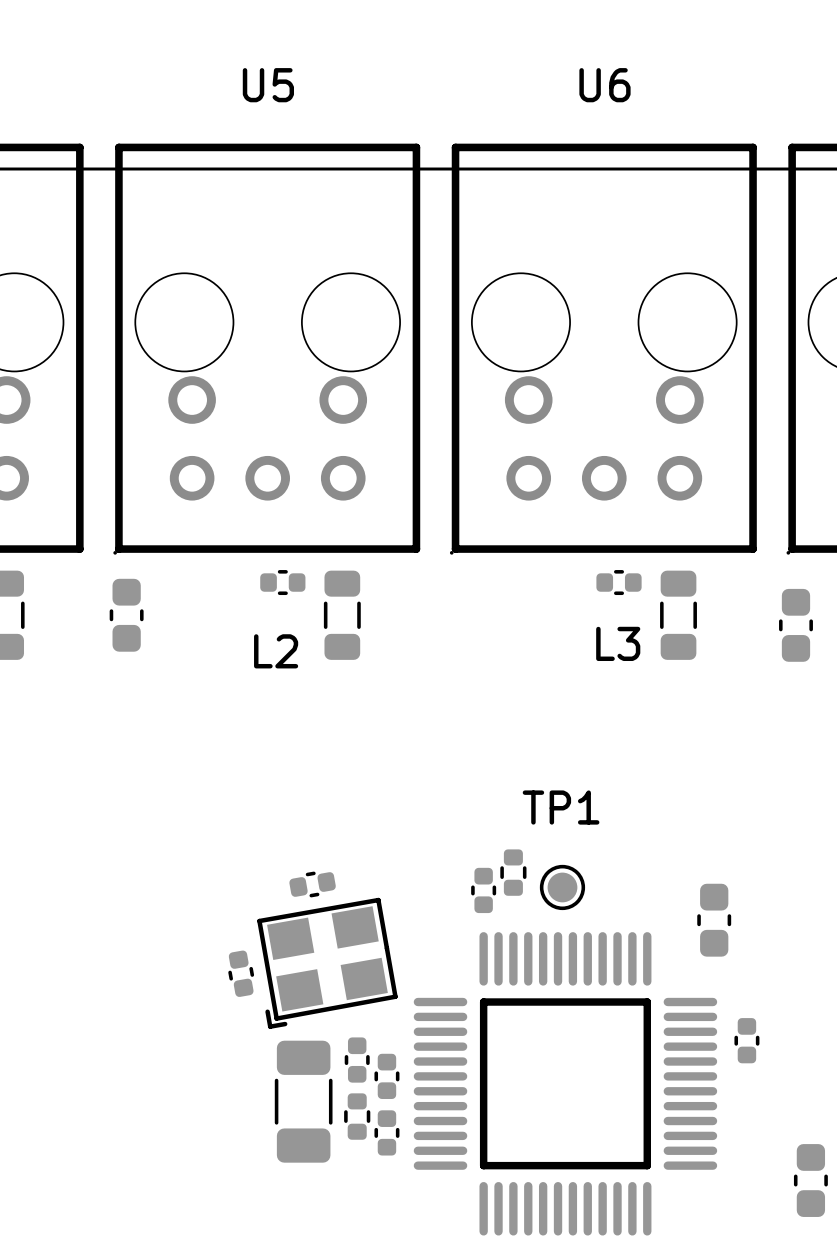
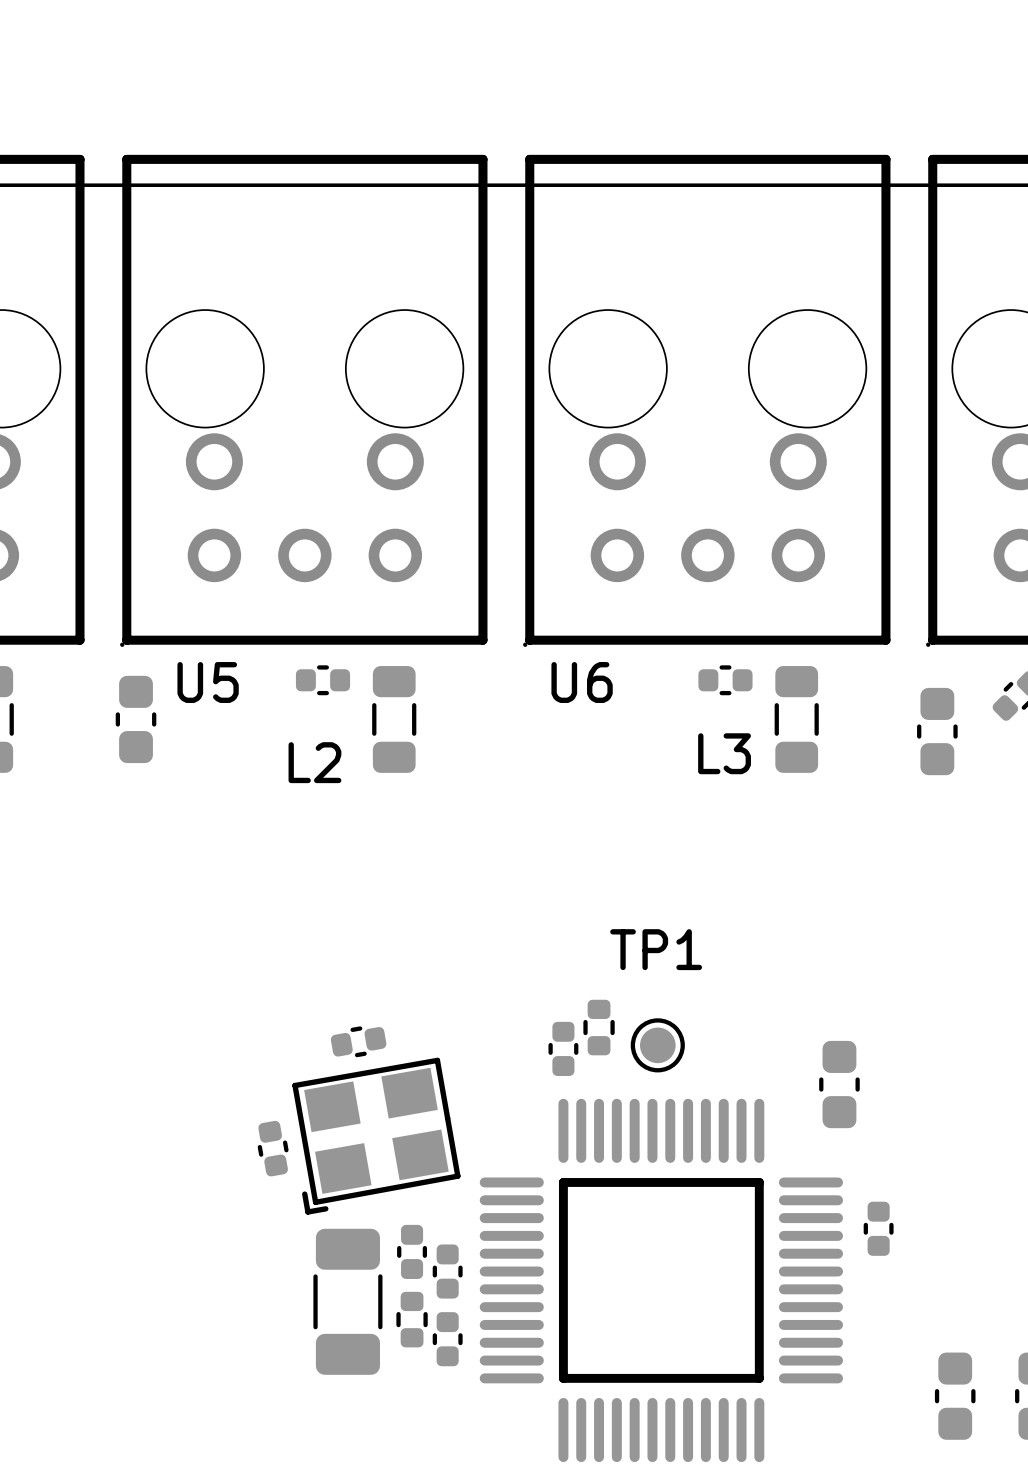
U5 name position: U5 (268, 85) -> U5 (208, 682)
U6 name position: U6 (604, 85) -> U6 (582, 682)

